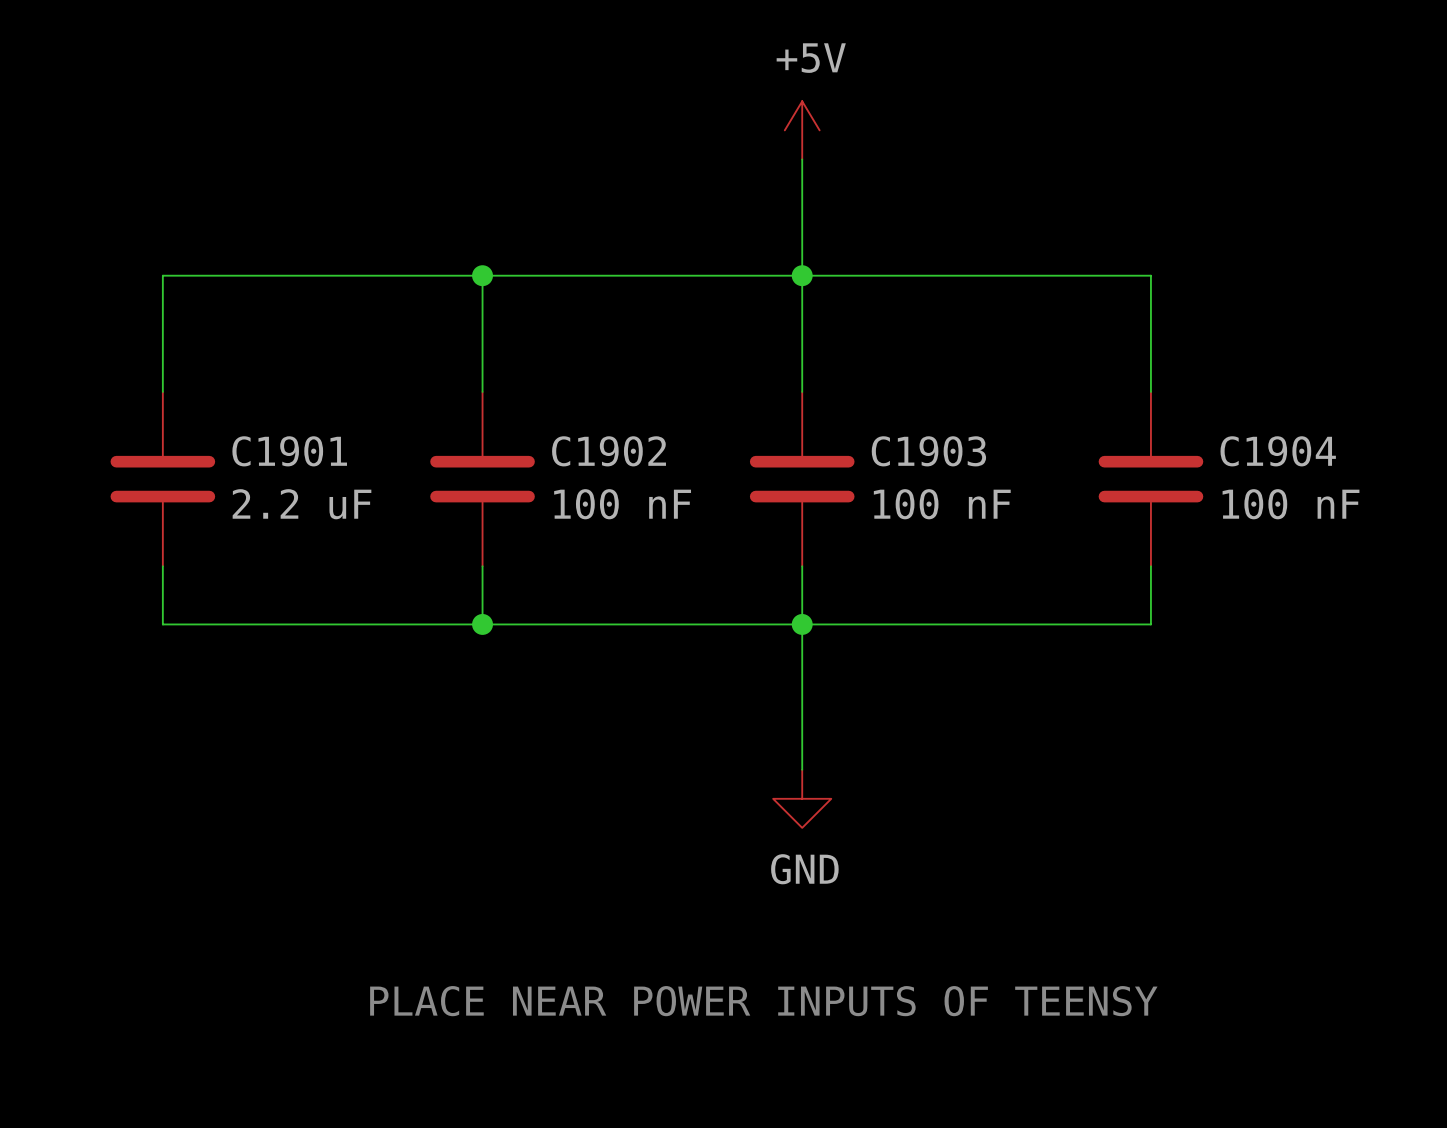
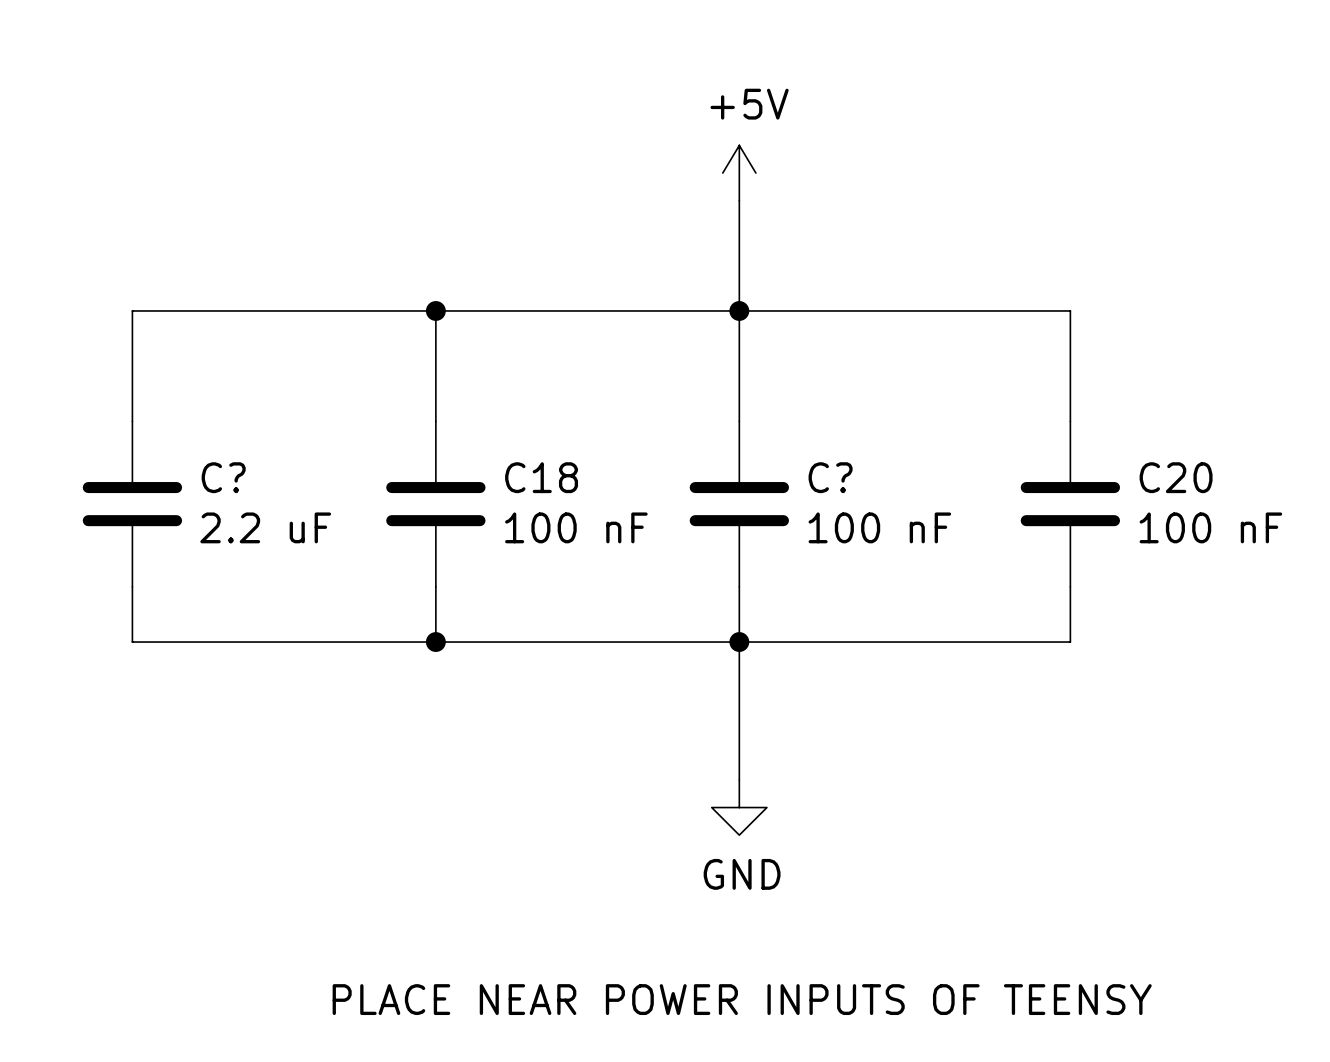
C1901 name: C1901 (289, 451) -> C? (223, 477)
C1902 name: C1902 (609, 451) -> C18 (541, 477)
C1903 name: C1903 (928, 451) -> C? (830, 477)
C1904 name: C1904 (1278, 451) -> C20 (1176, 477)

